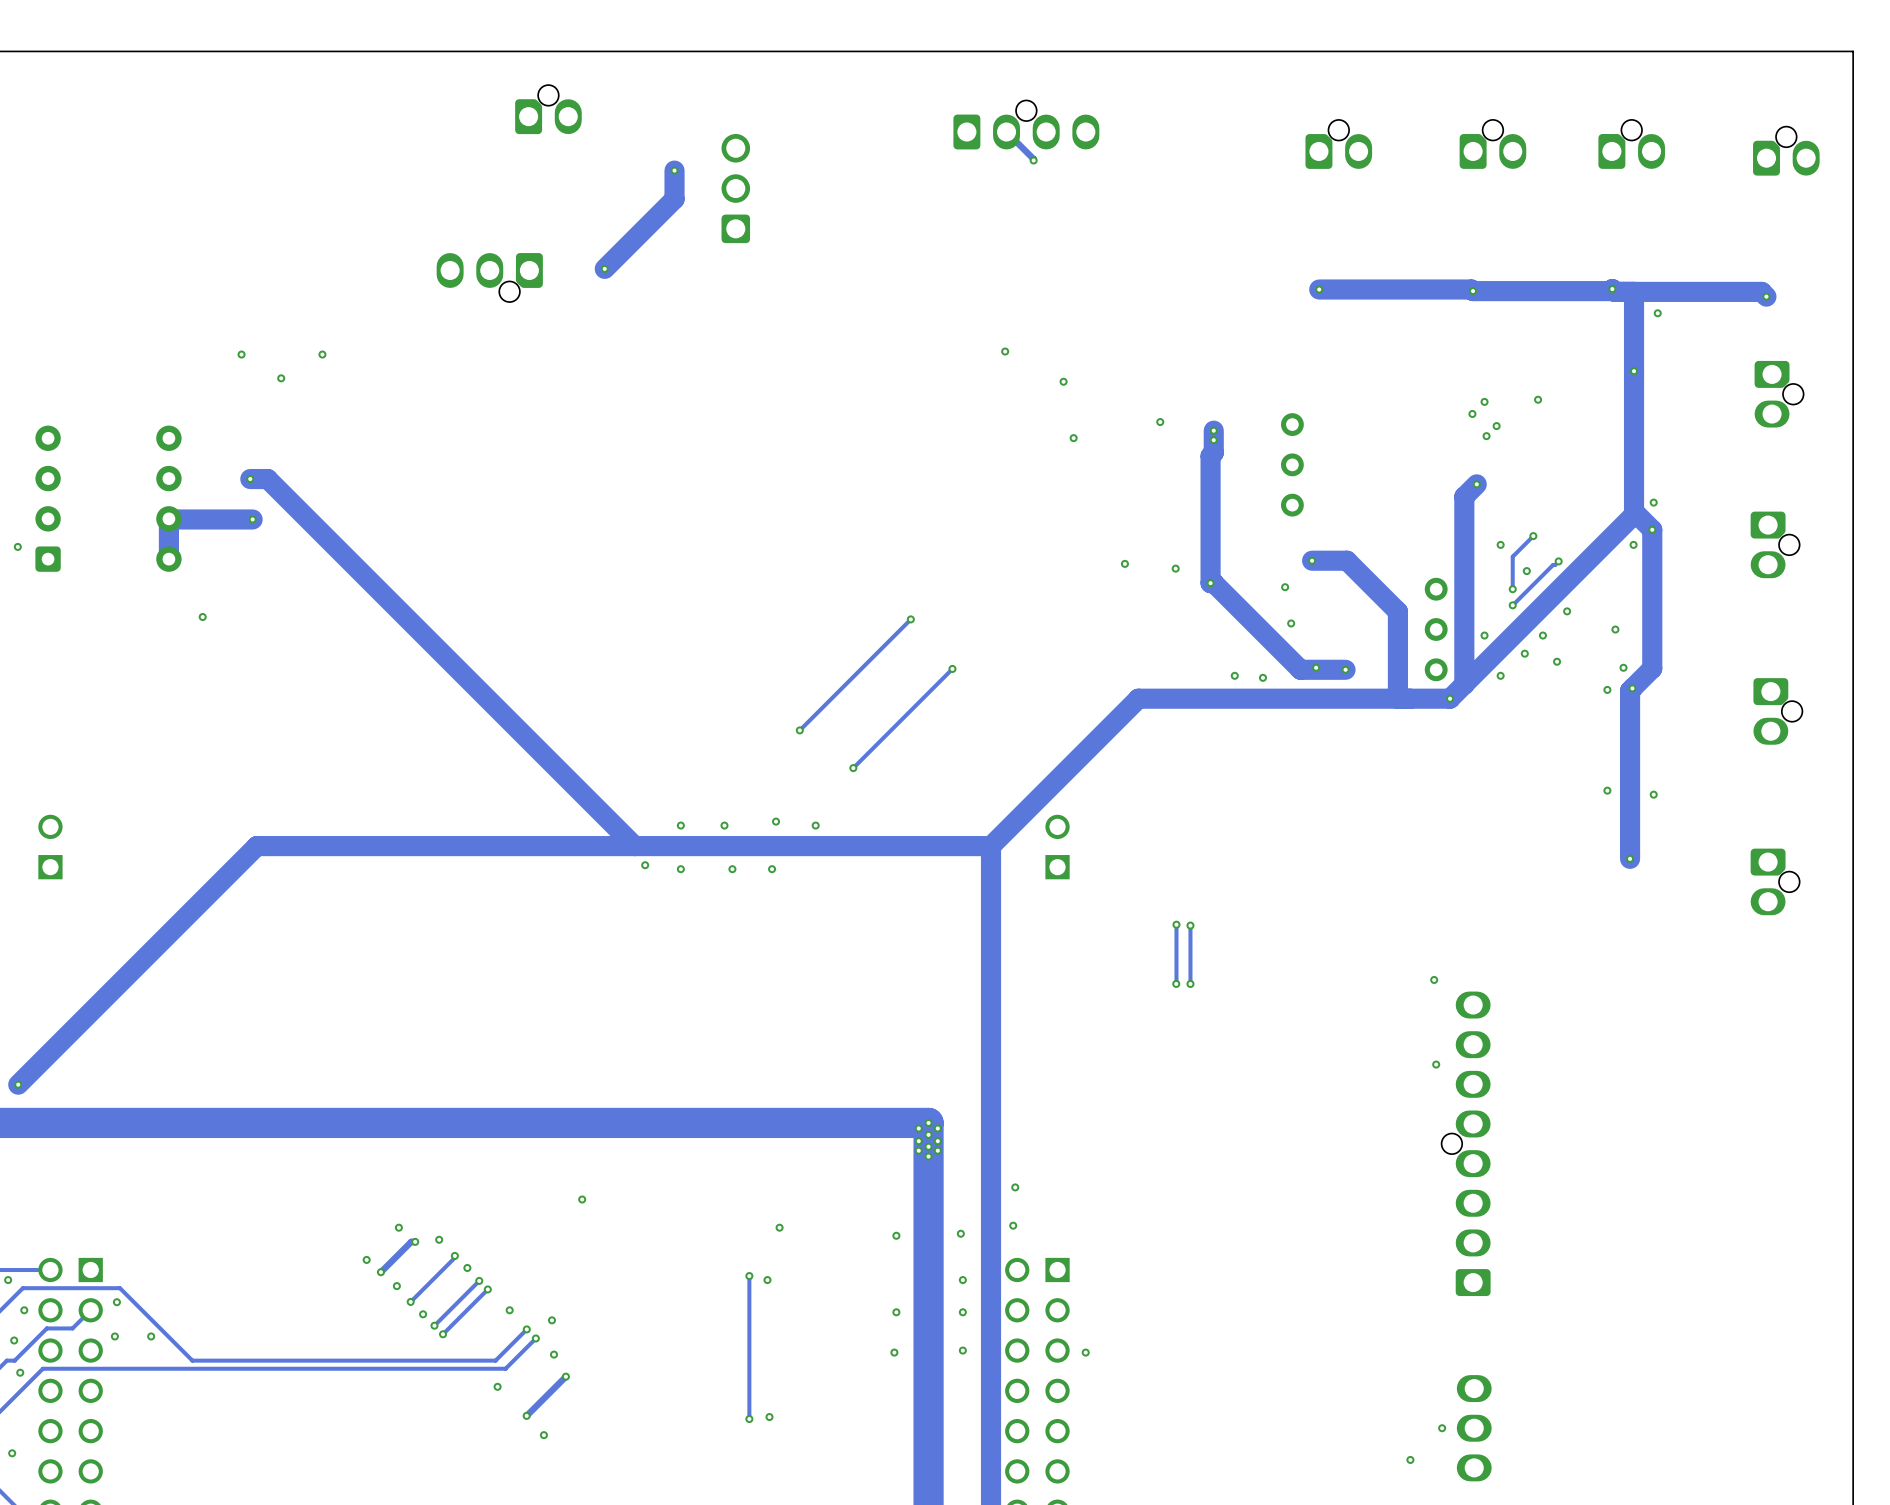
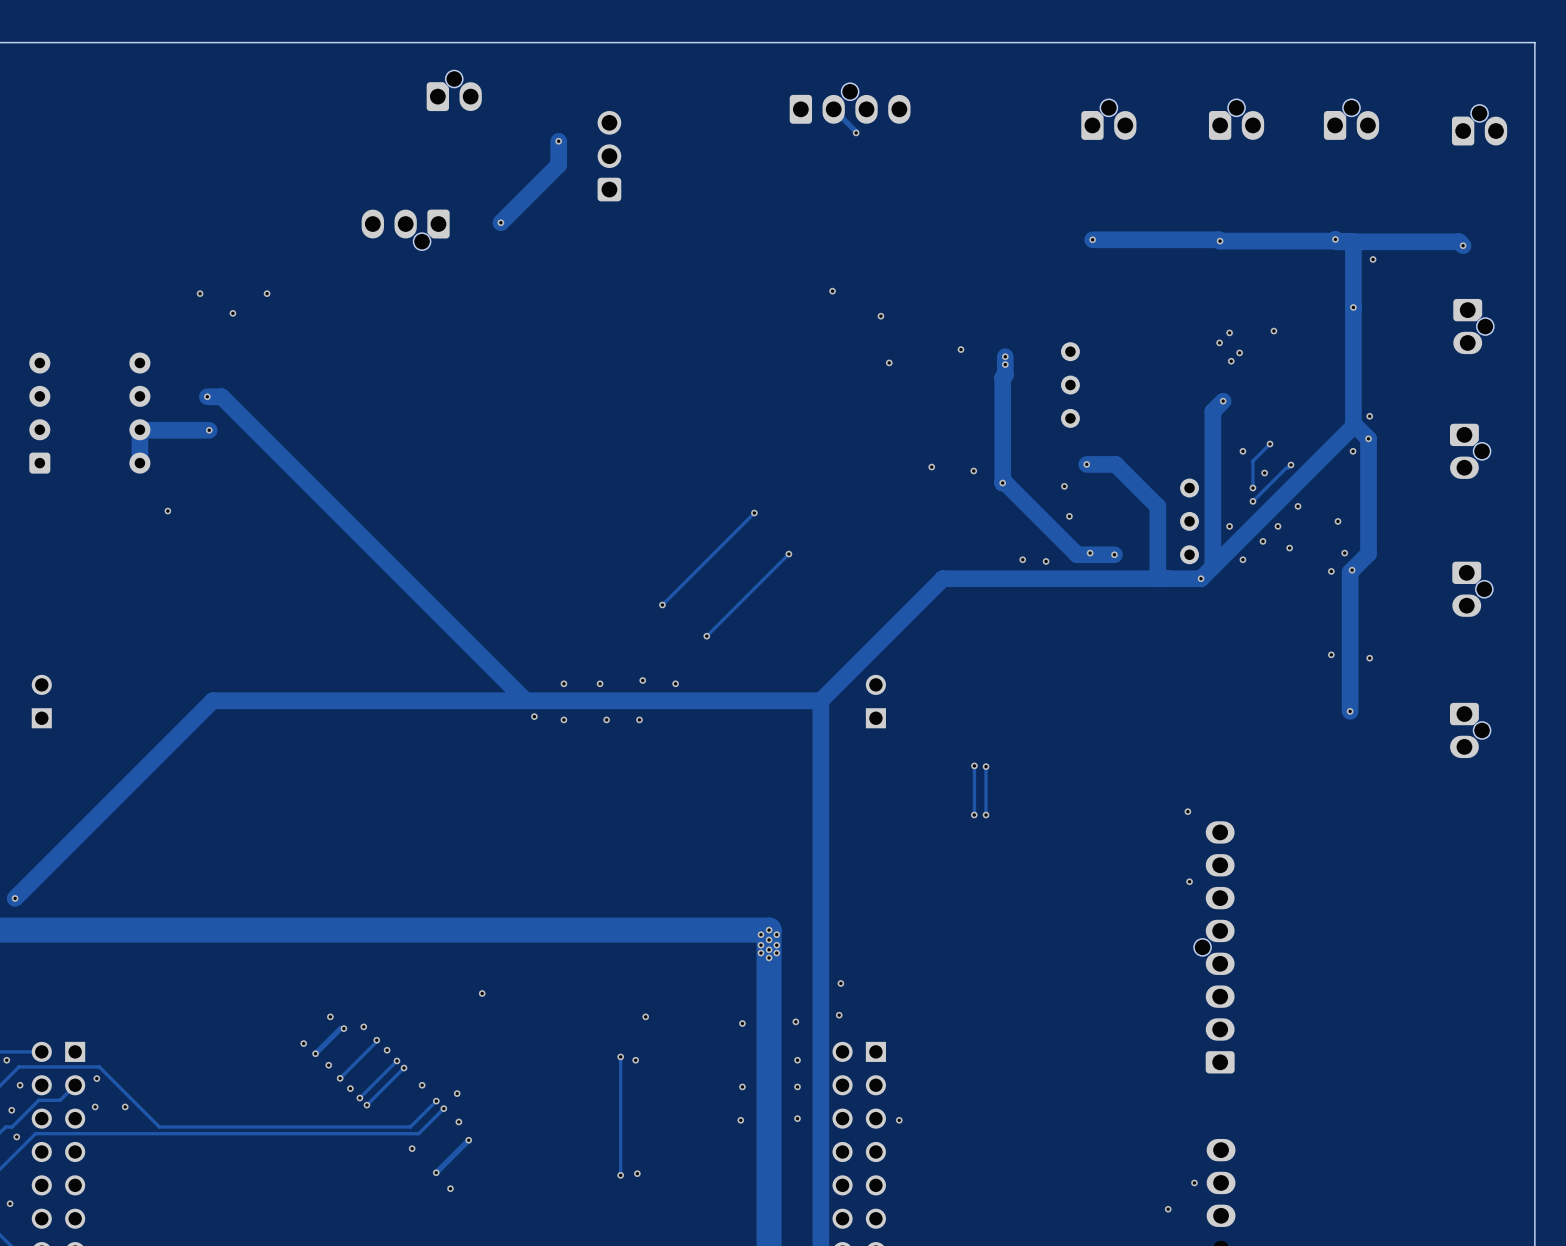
via: (17, 546) -> none

